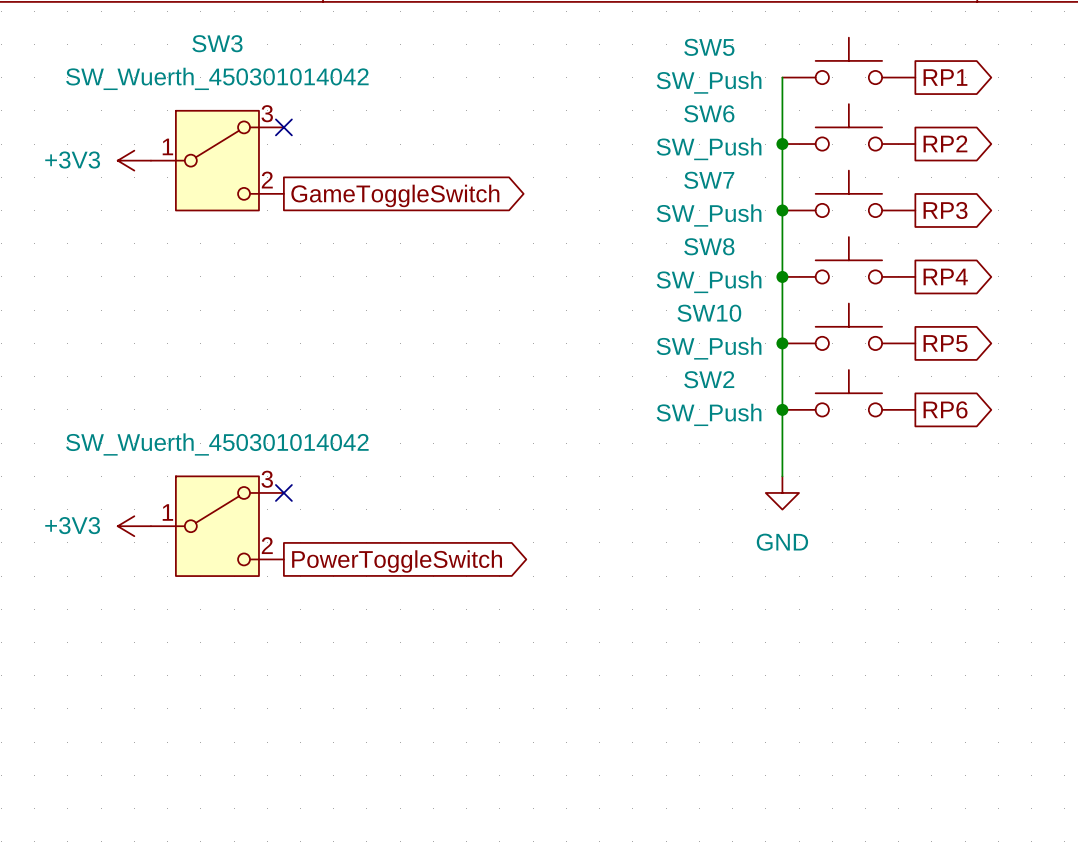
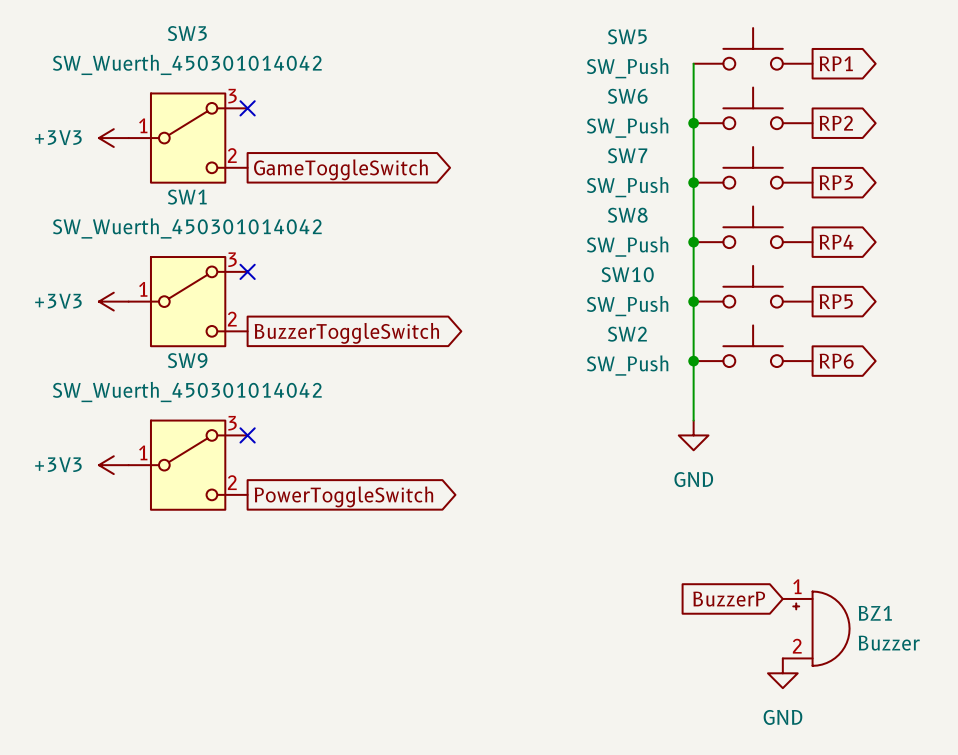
no-connect mark: none -> (247, 271)
power symbol: none -> +3V3 (113, 301)
SW1: none -> SW_Wuerth_450301014042 (188, 301)
global label: none -> BuzzerToggleSwitch (346, 333)
SW9 name: none -> SW9 (187, 360)
global label: none -> BuzzerP (729, 599)
BZ1: none -> Buzzer (816, 628)
power symbol: none -> GND (782, 673)

